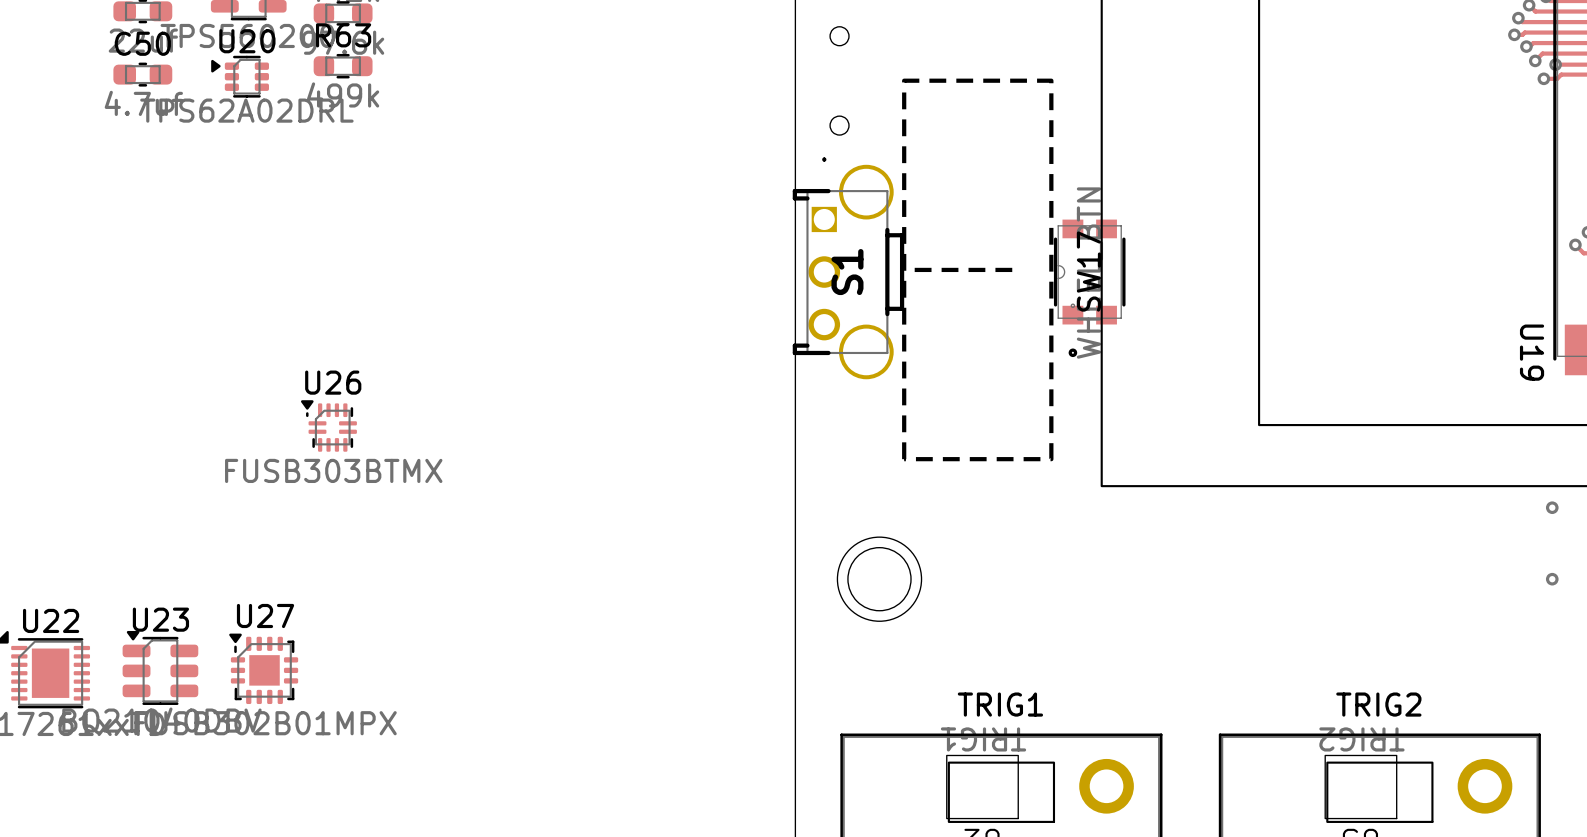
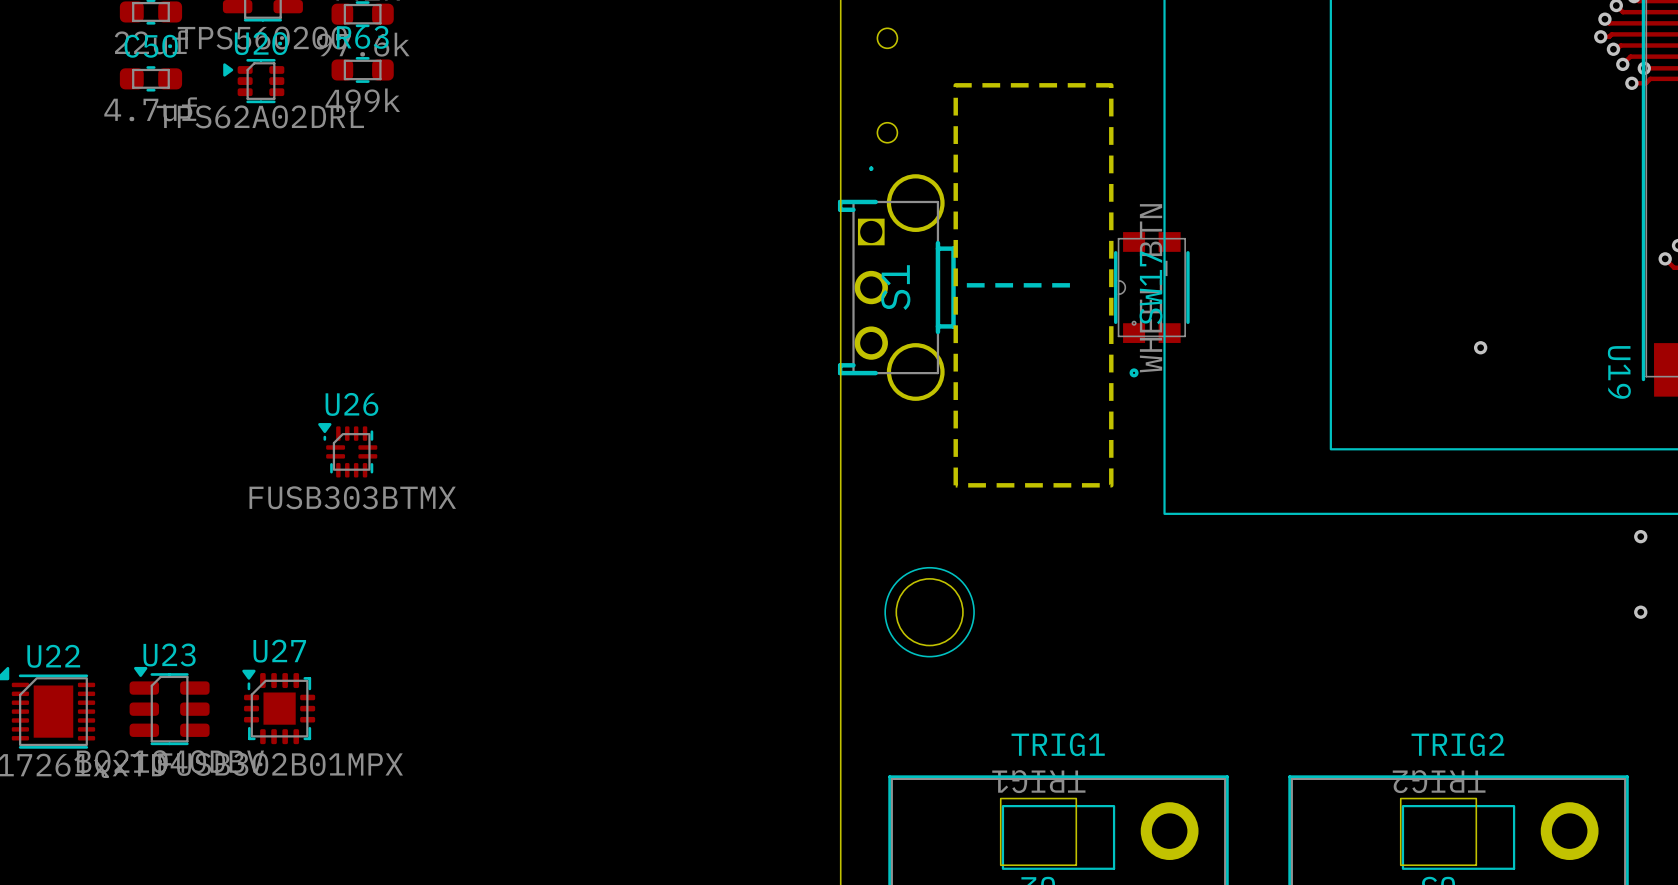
via: none -> (1480, 347)

